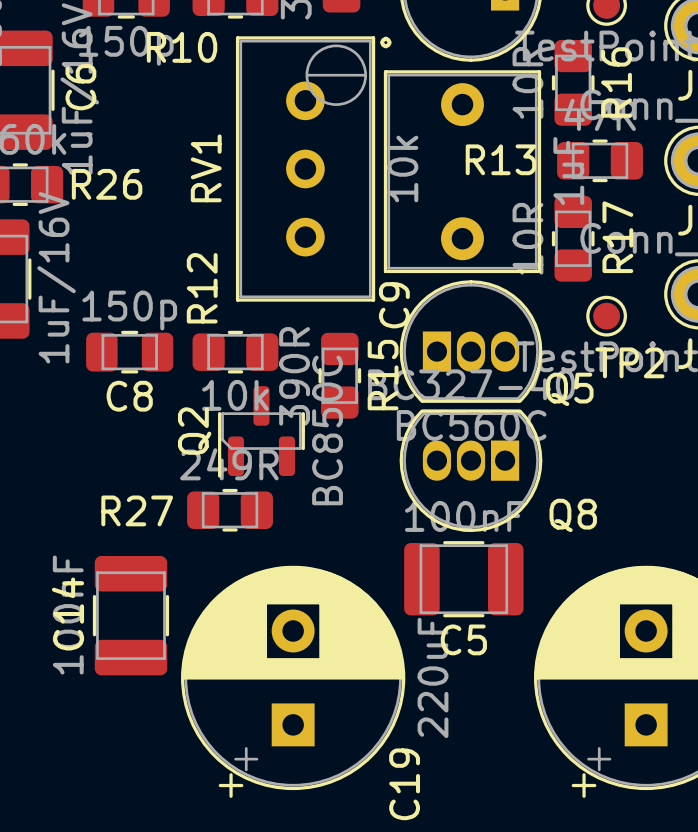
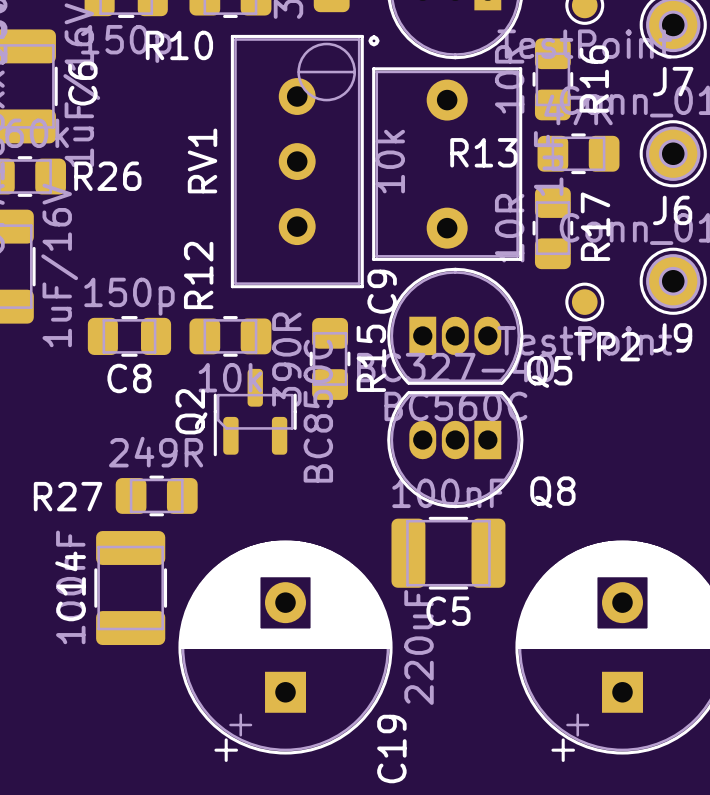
R27 position: (230, 510) -> (156, 495)

